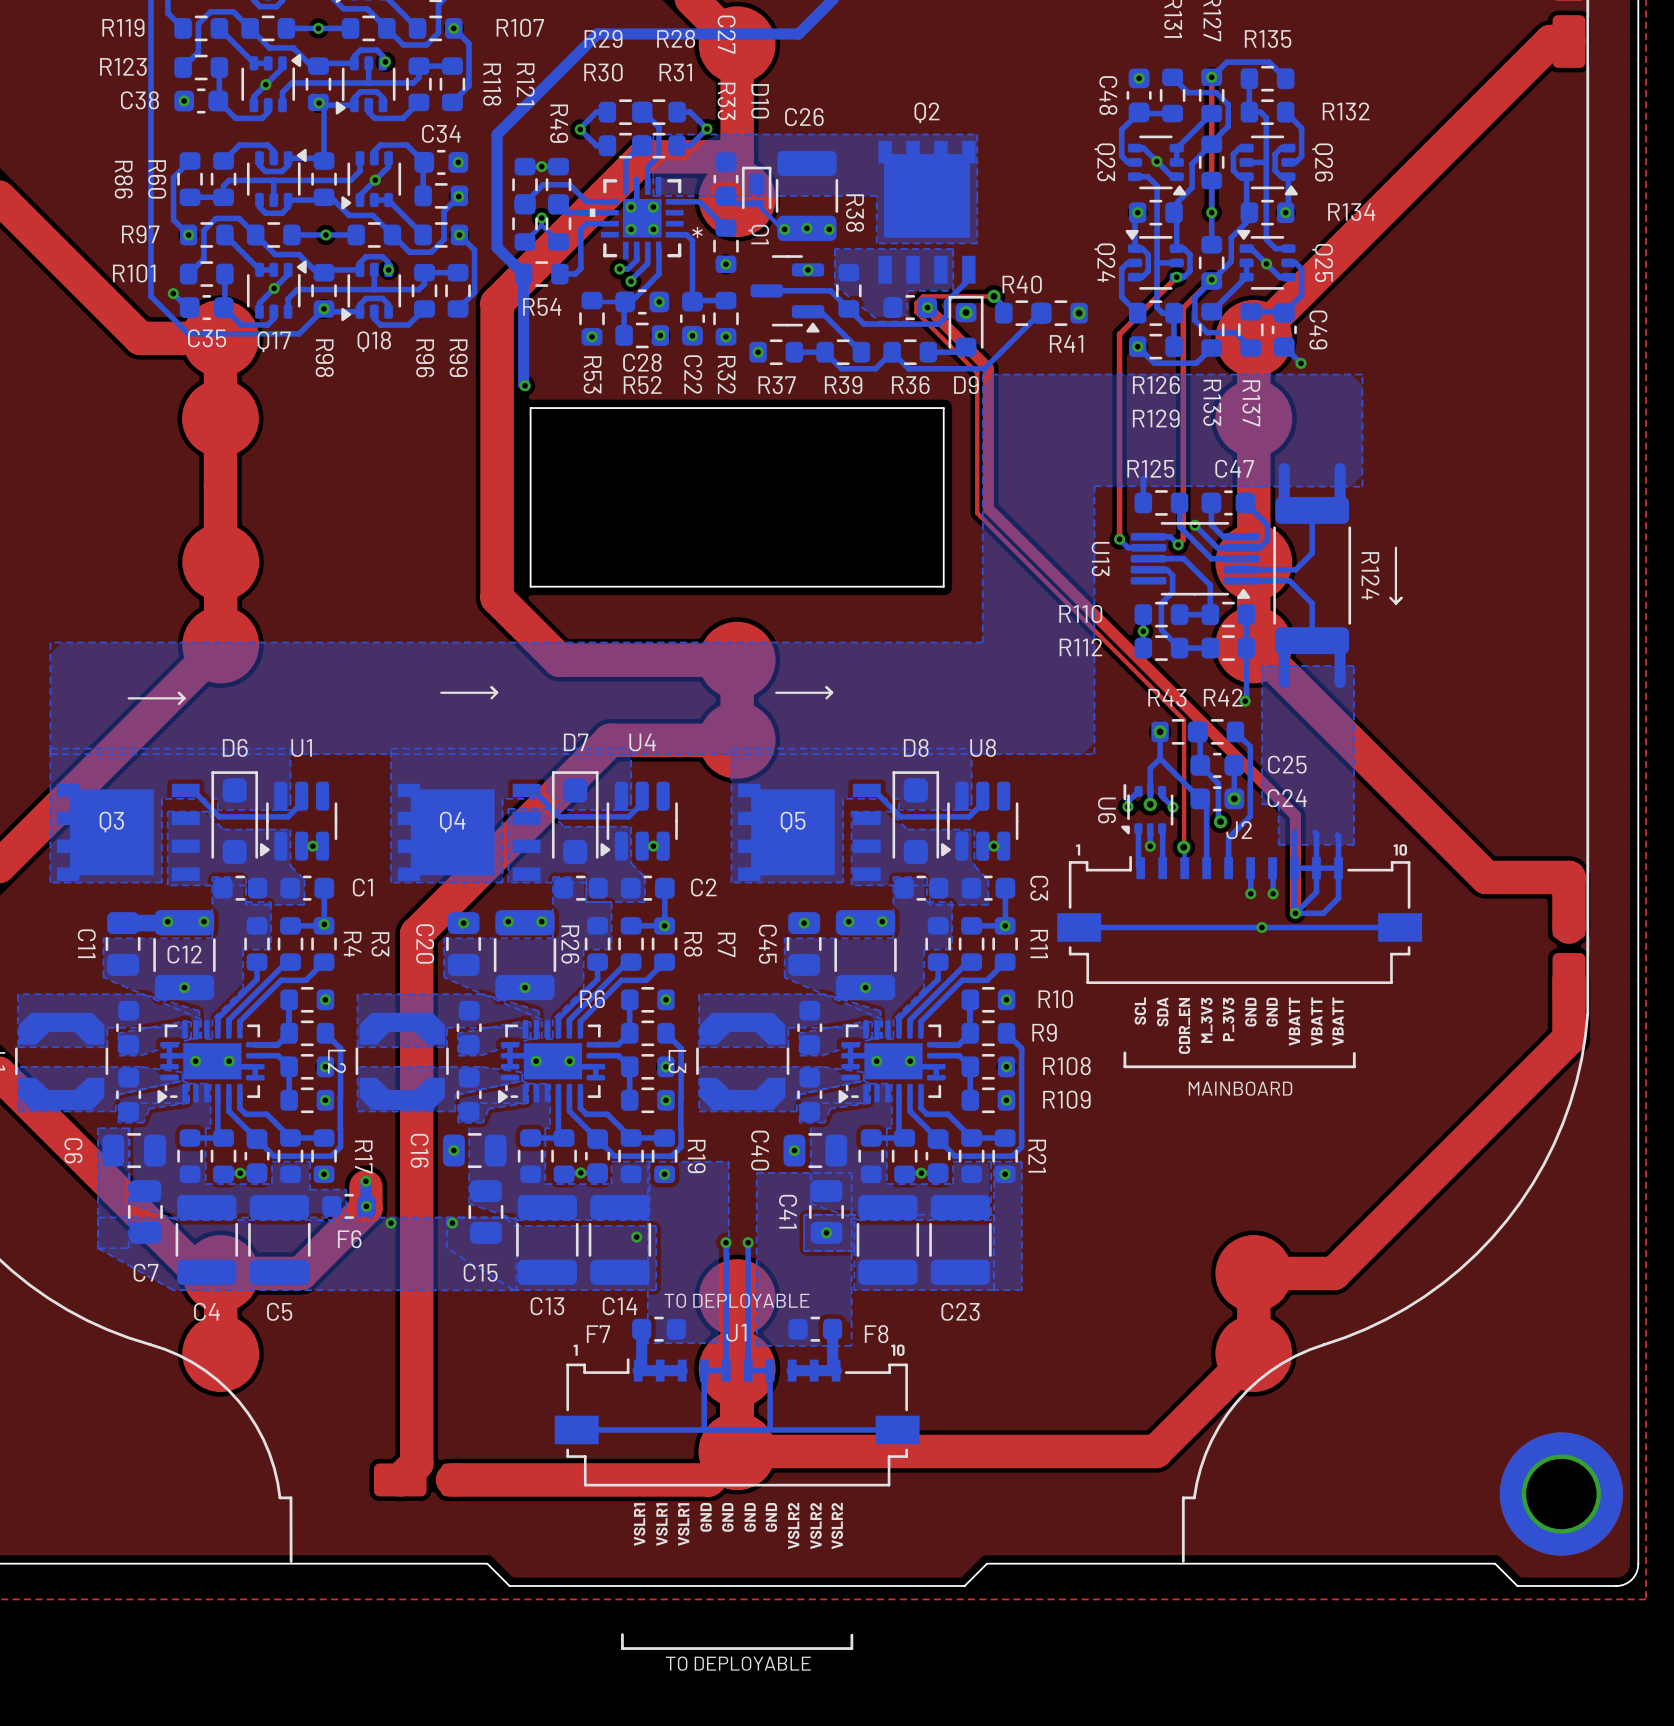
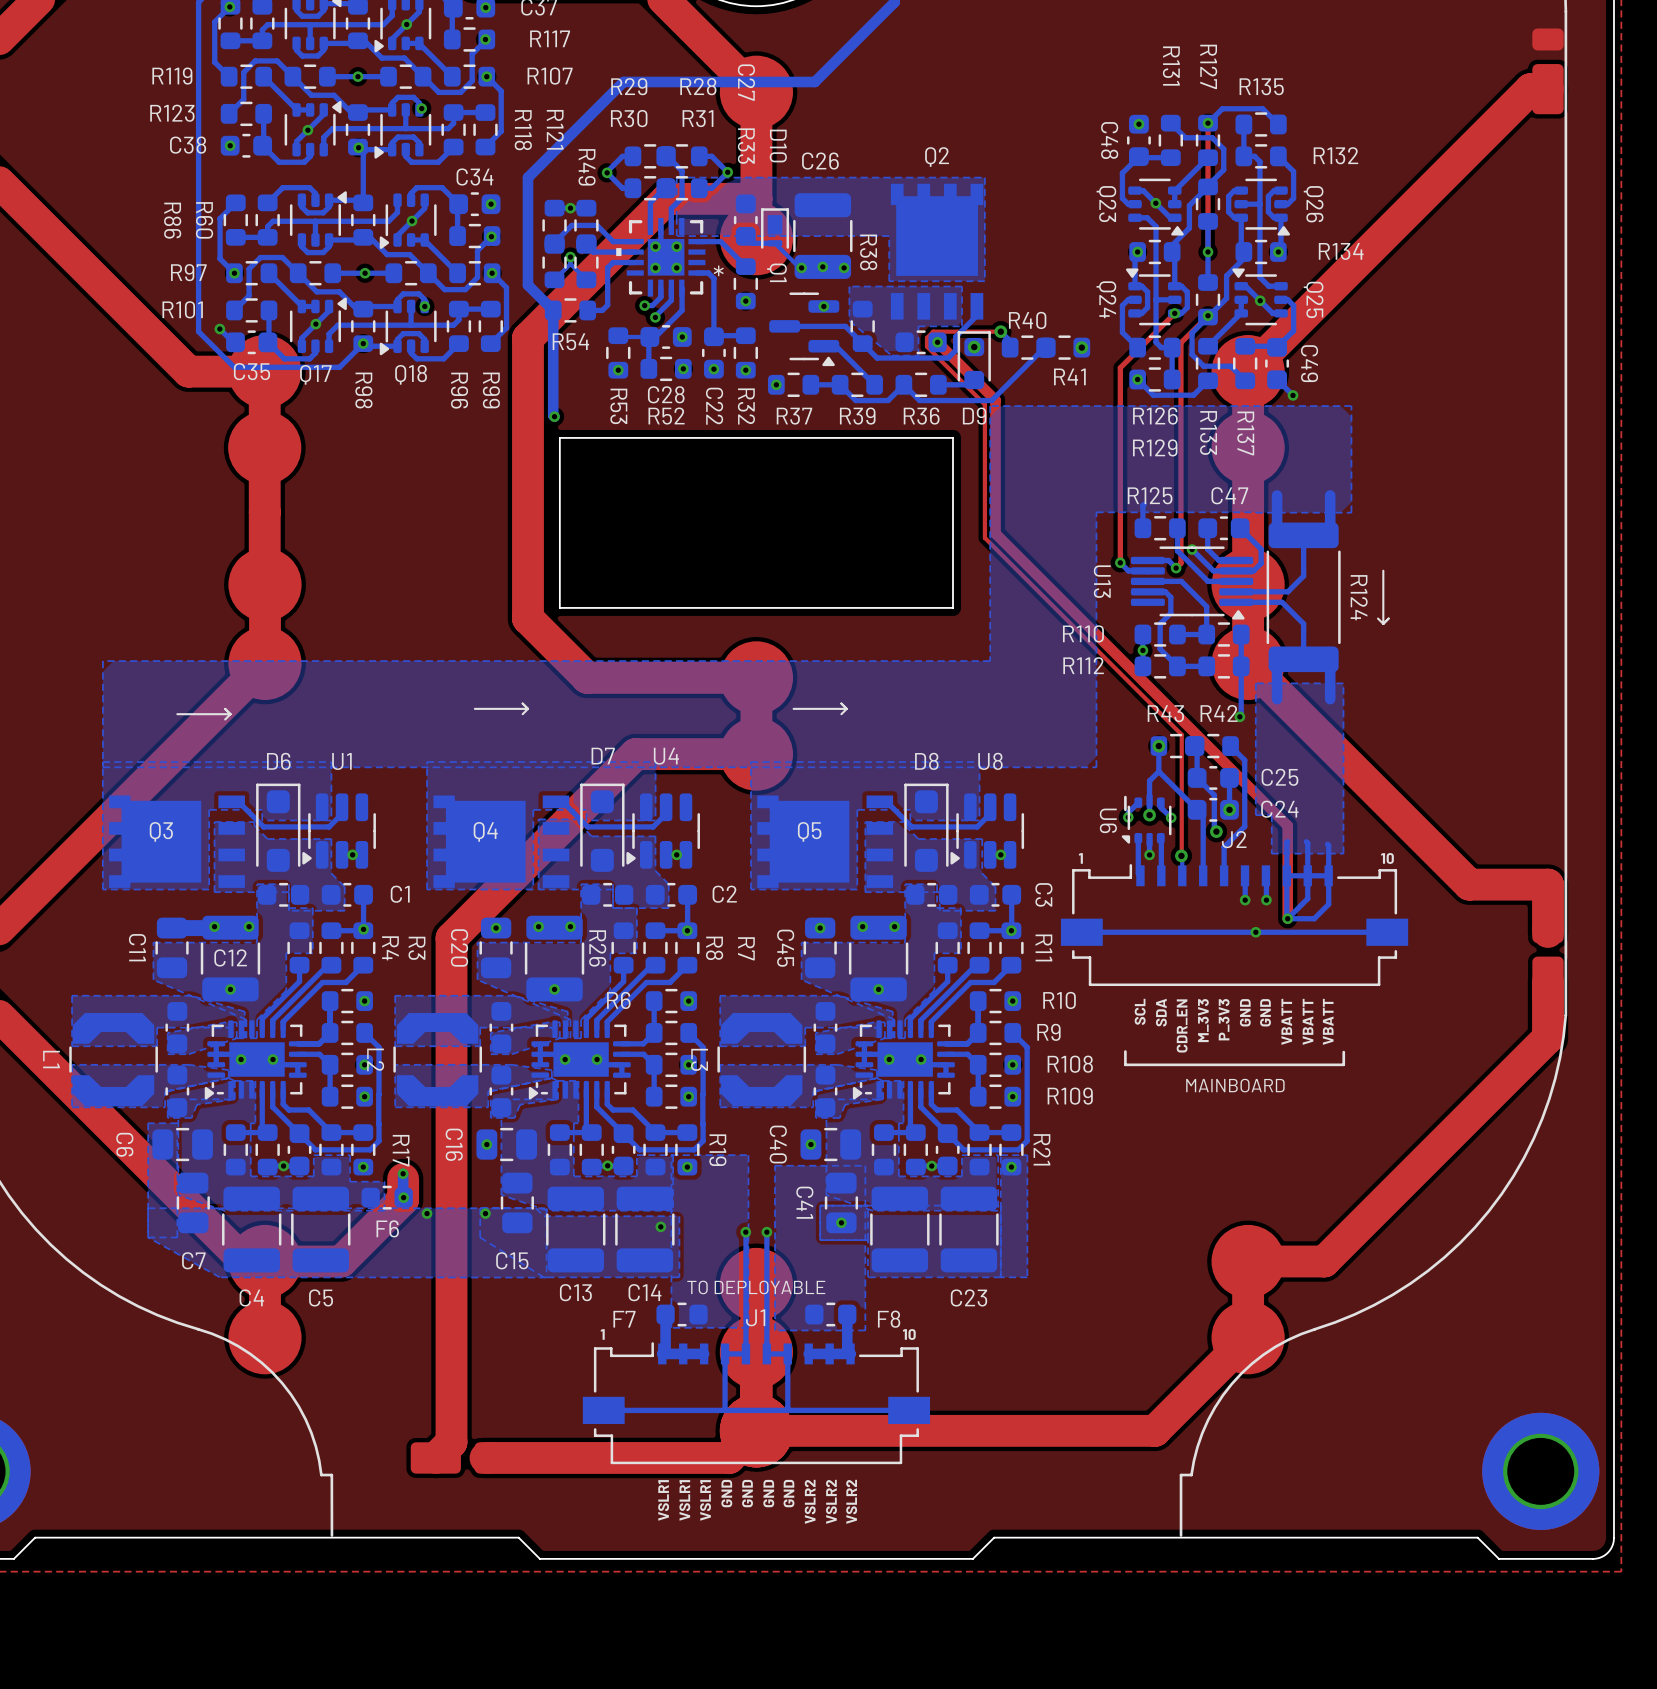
line: (622, 1634) (622, 1648) (851, 1648) (851, 1635) -> none
text: TO DEPLOYABLE (738, 1663) -> none

